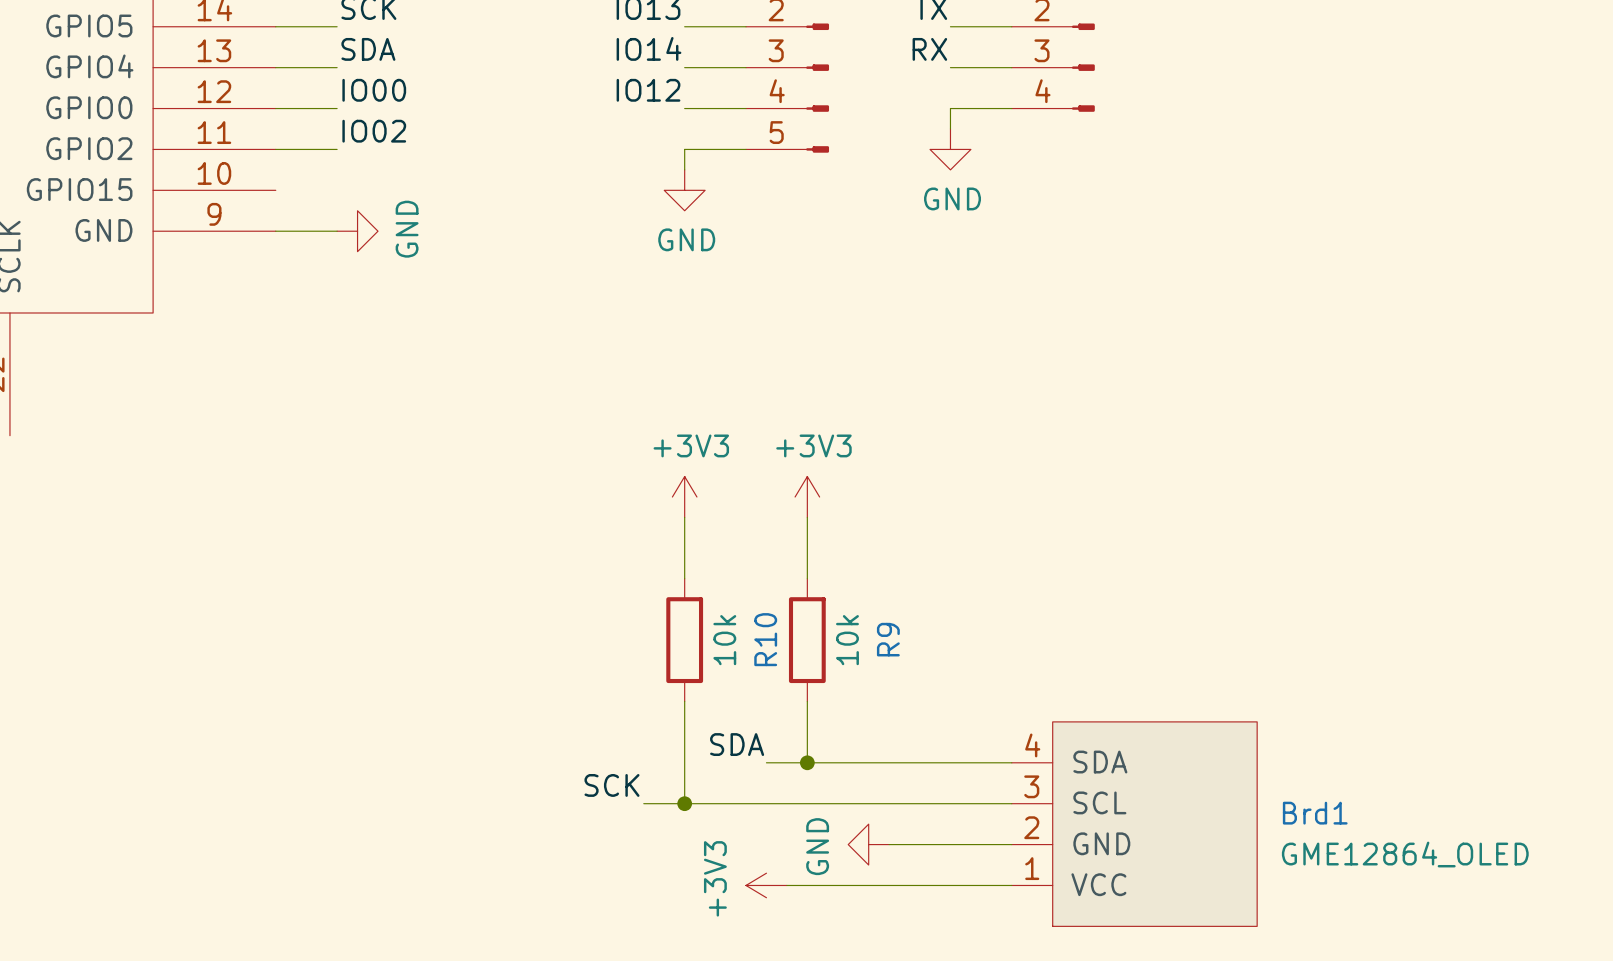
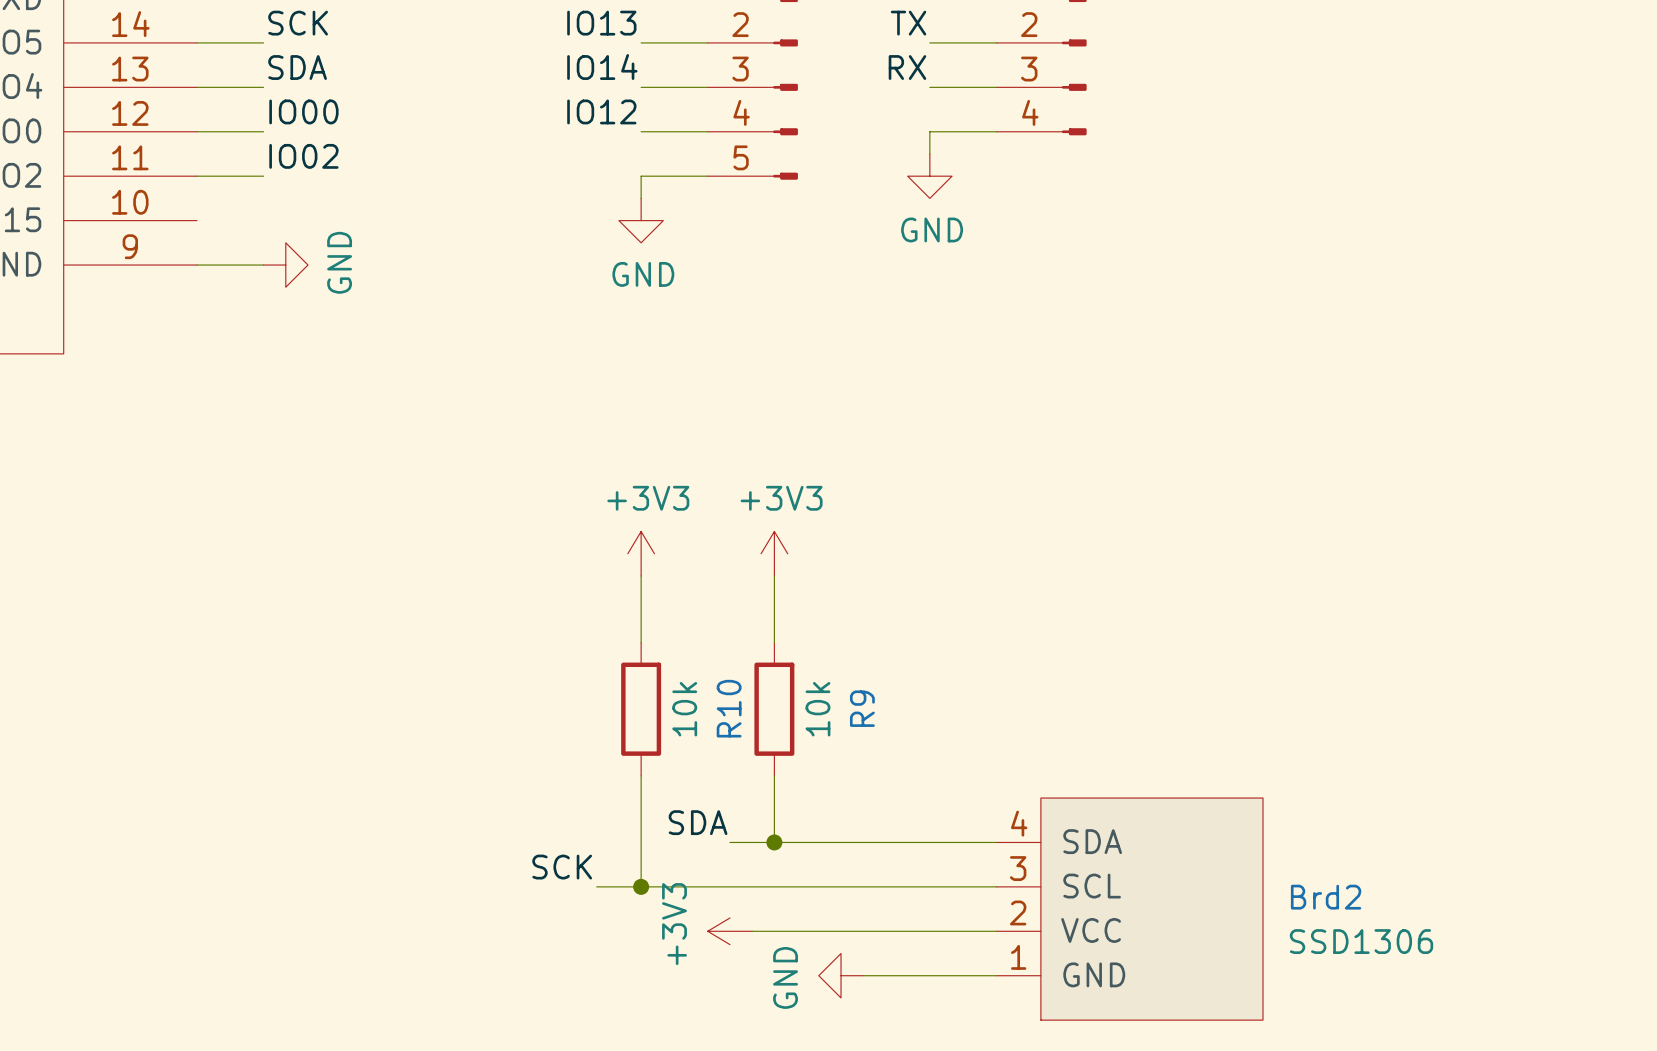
Brd1 name: Brd1 (1315, 813) -> Brd2 (1326, 897)
Brd1 pin name: GND (1101, 843) -> VCC (1091, 930)
power symbol position: GND (868, 844) -> GND (841, 975)
Brd1 value: GME12864_OLED (1405, 854) -> SSD1306 (1361, 941)
Brd1 pin name: VCC (1098, 884) -> GND (1094, 974)
power symbol position: +3V3 (766, 885) -> +3V3 (729, 931)
wire: (786, 885) (889, 885) -> (752, 931) (863, 931)

